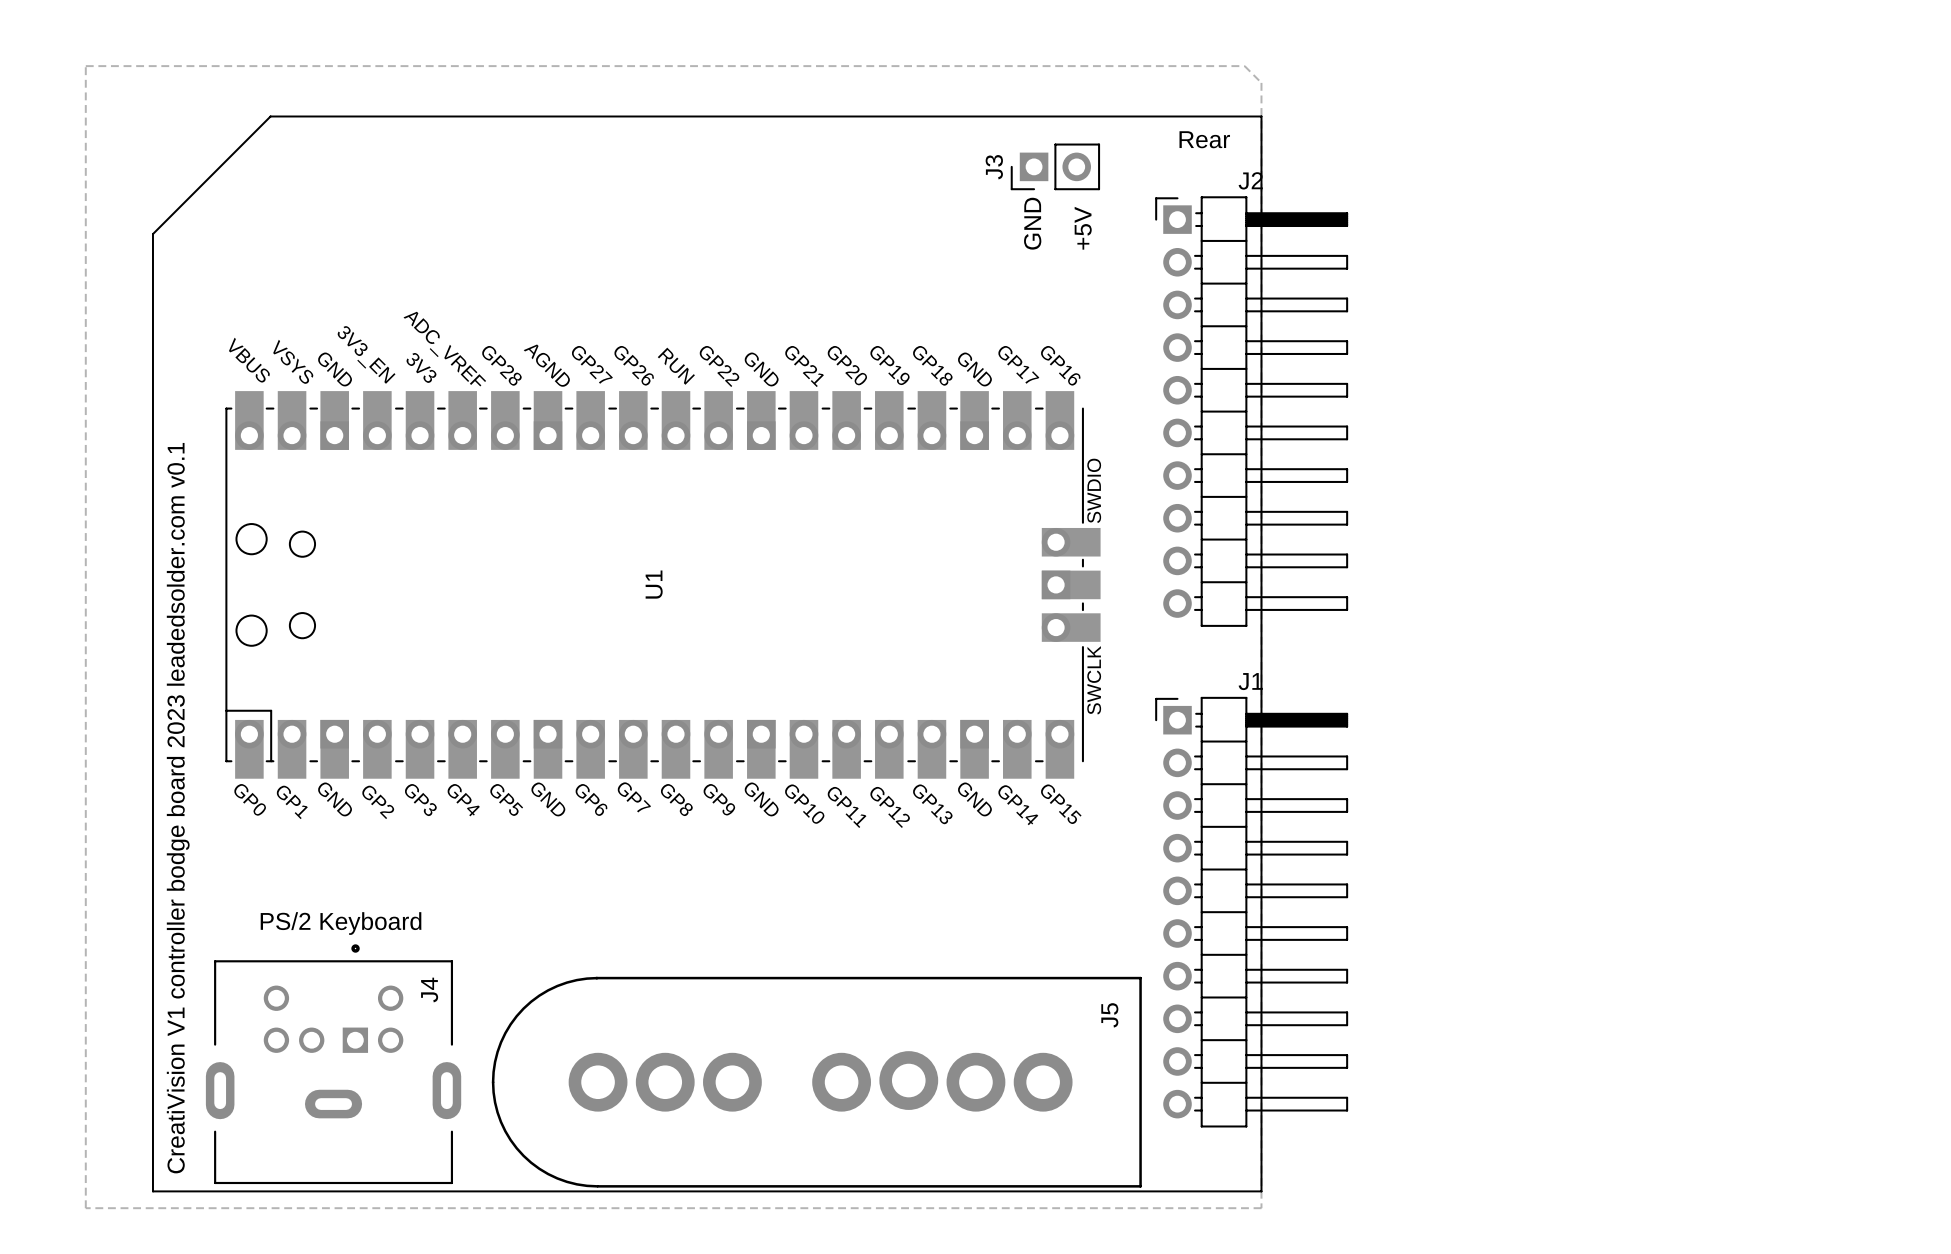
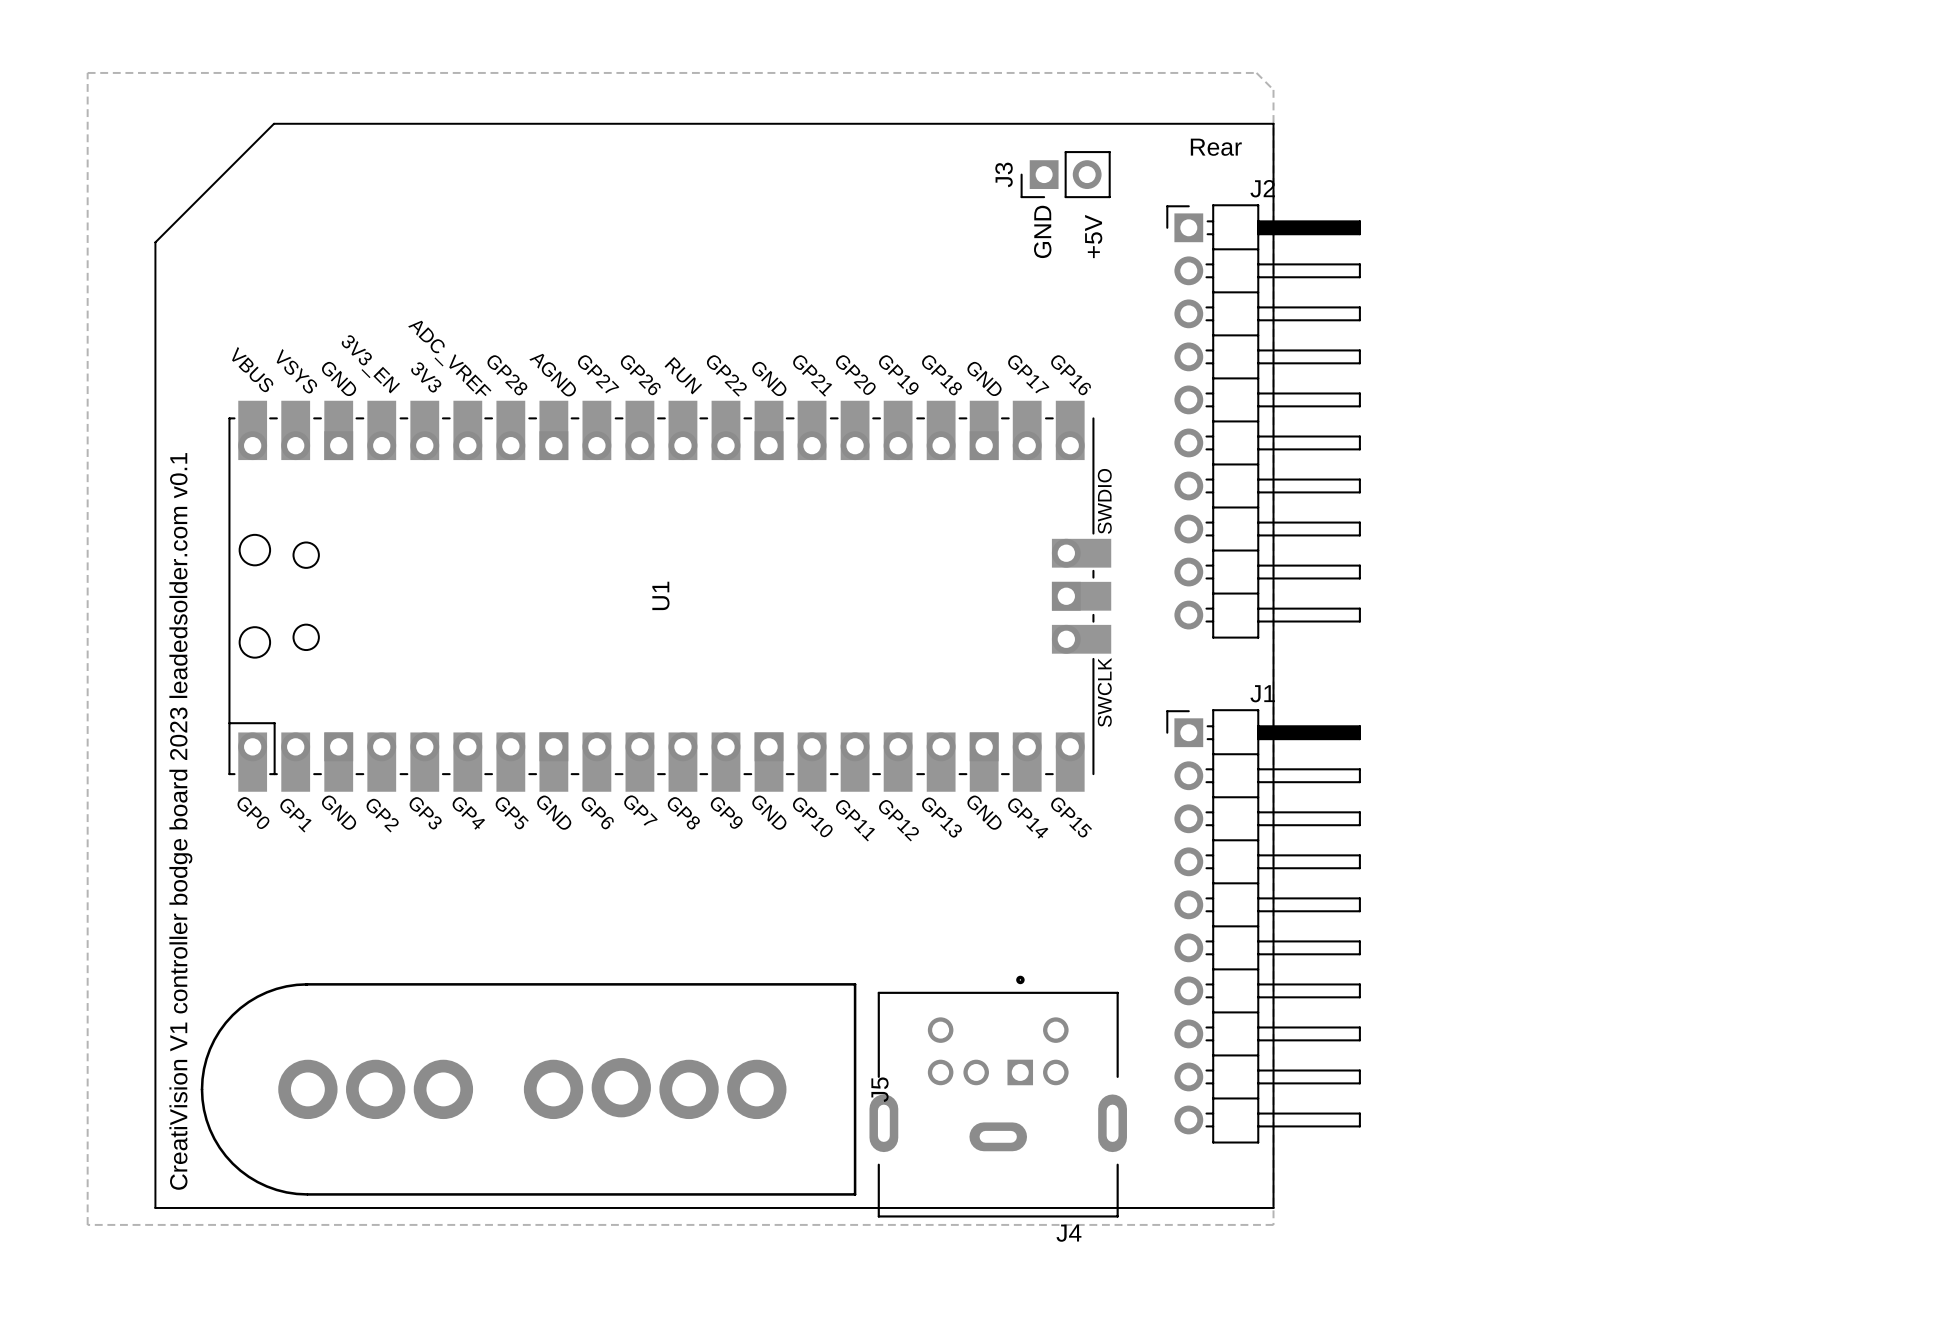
J4 value: PS/2 Keyboard (341, 923) -> none
J4 name rotation: 0° (429, 990) -> 90° clockwise (1068, 1233)
J4 name position: J4 (429, 990) -> J4 (1068, 1233)
J5 name position: J5 (1109, 1015) -> J5 (879, 1089)
J4 position: (333, 1064) -> (998, 1096)
J5 position: (816, 1082) -> (528, 1089)

